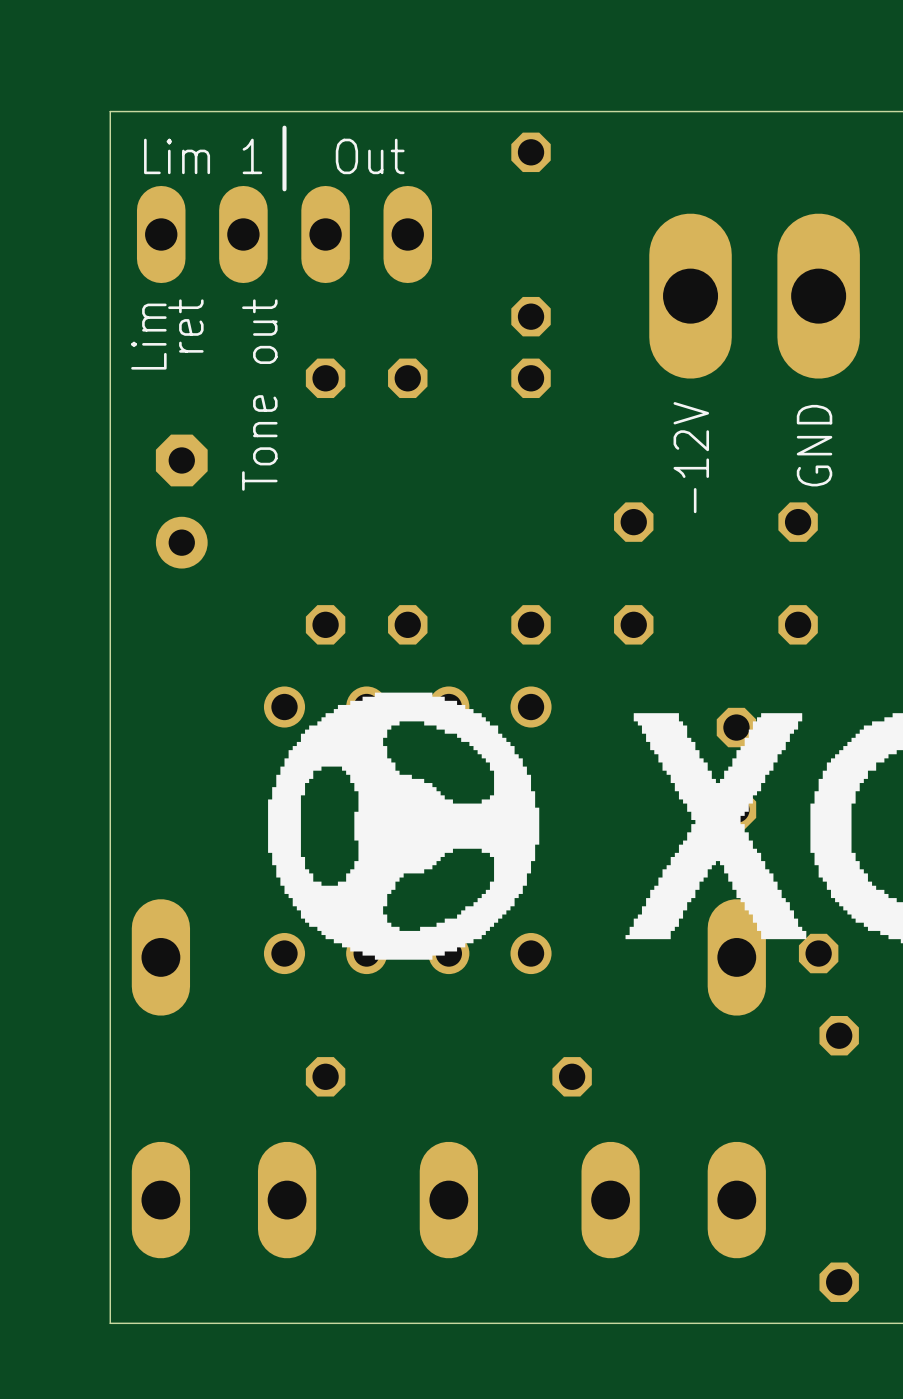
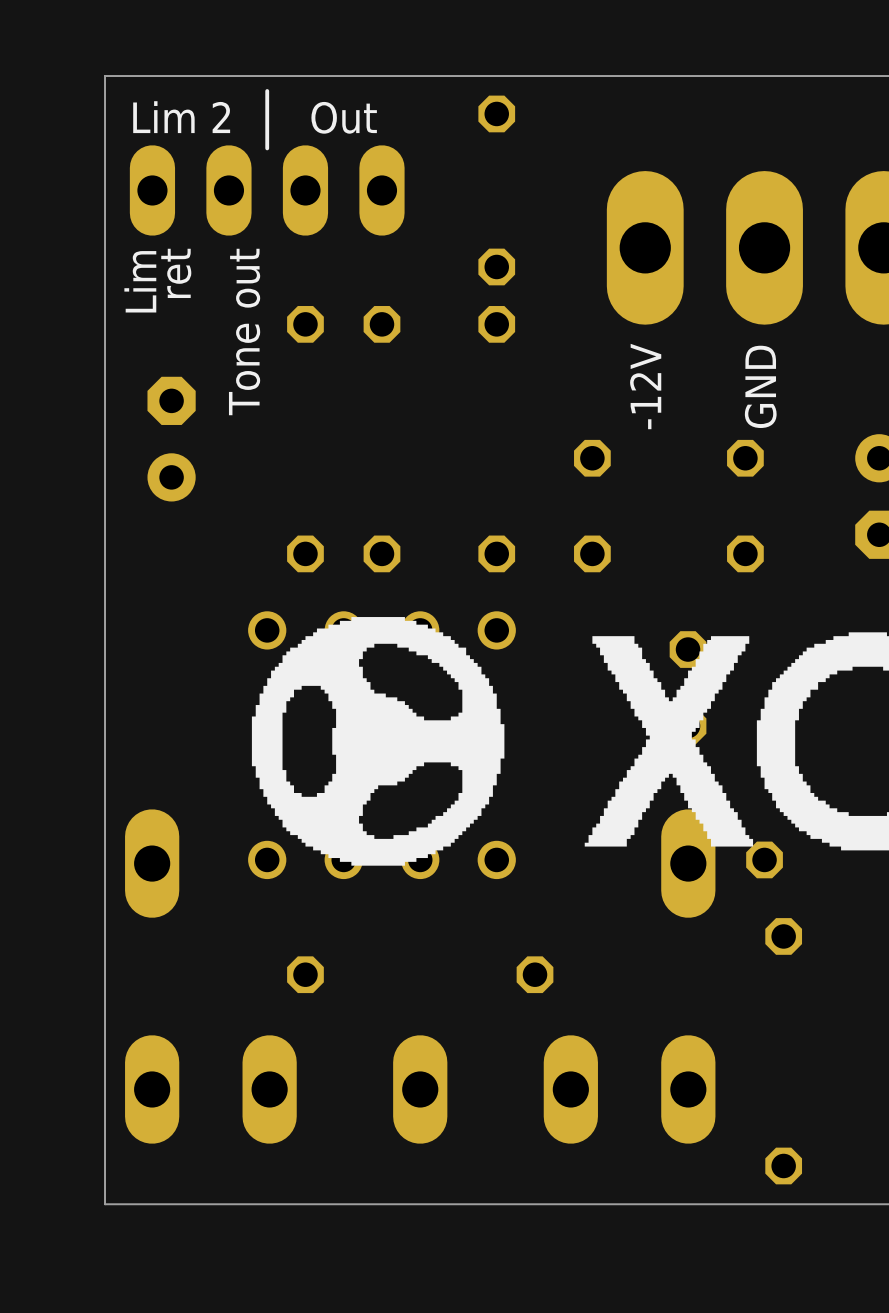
text: Lim 1 (203, 156) -> Lim 2 (181, 117)

